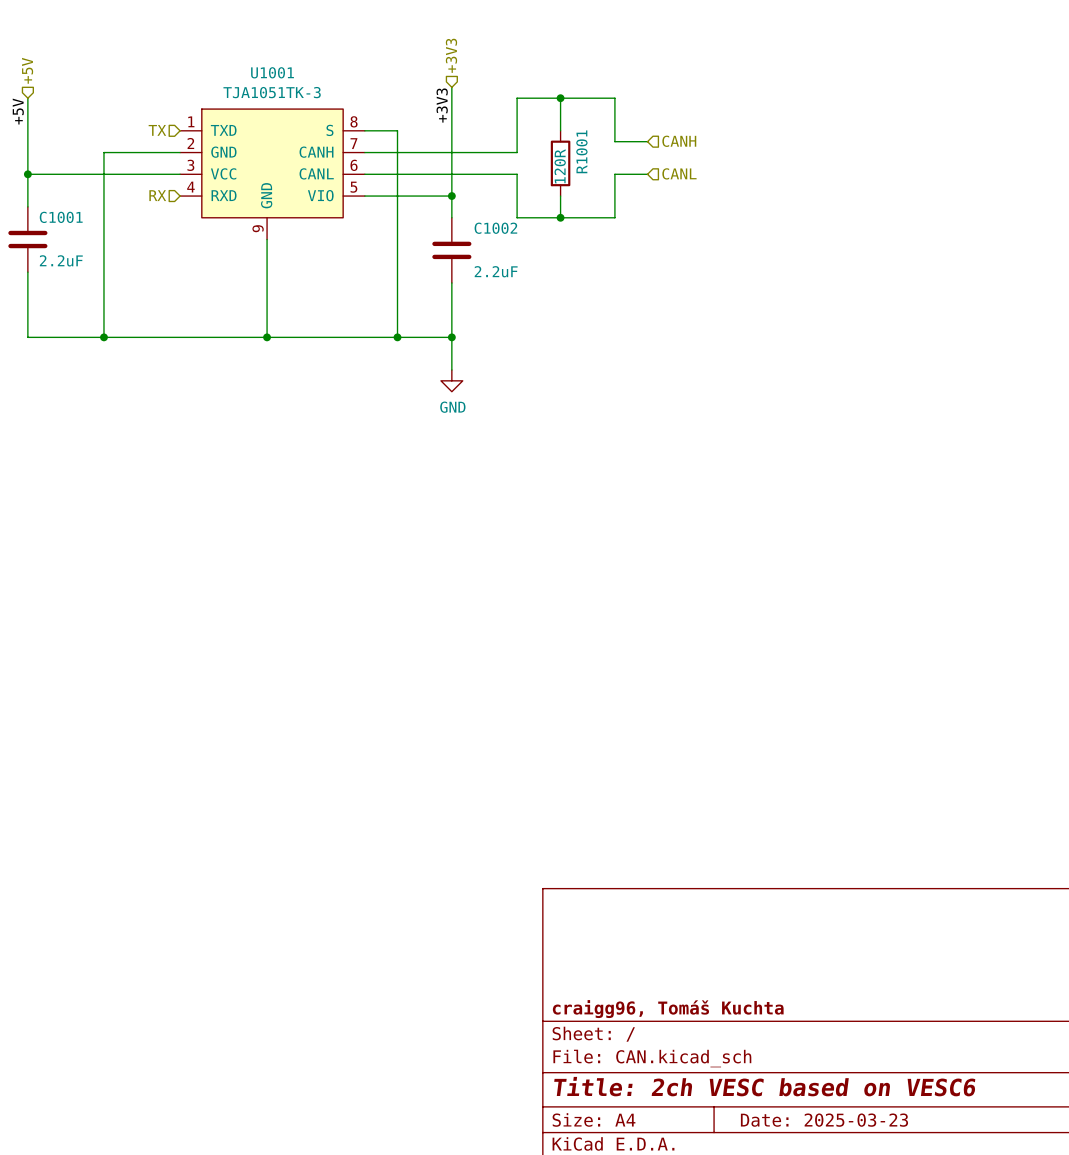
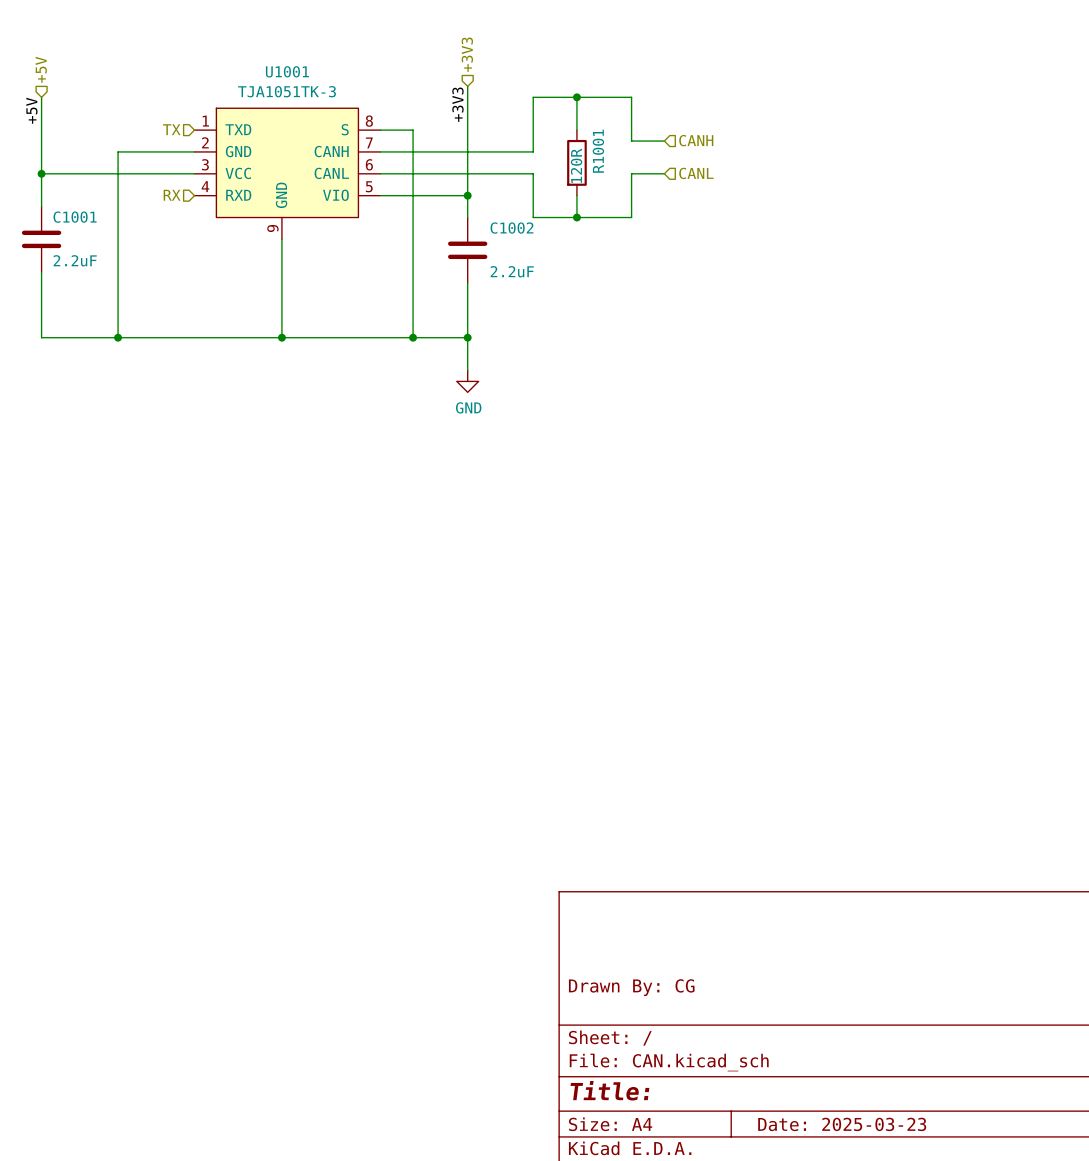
title block: none -> Drawn By: CG (631, 987)
title block: craigg96, Tomáš Kuchta (668, 1009) -> none
title block: Title: 2ch VESC based on VESC6 (764, 1086) -> Title: (609, 1090)

